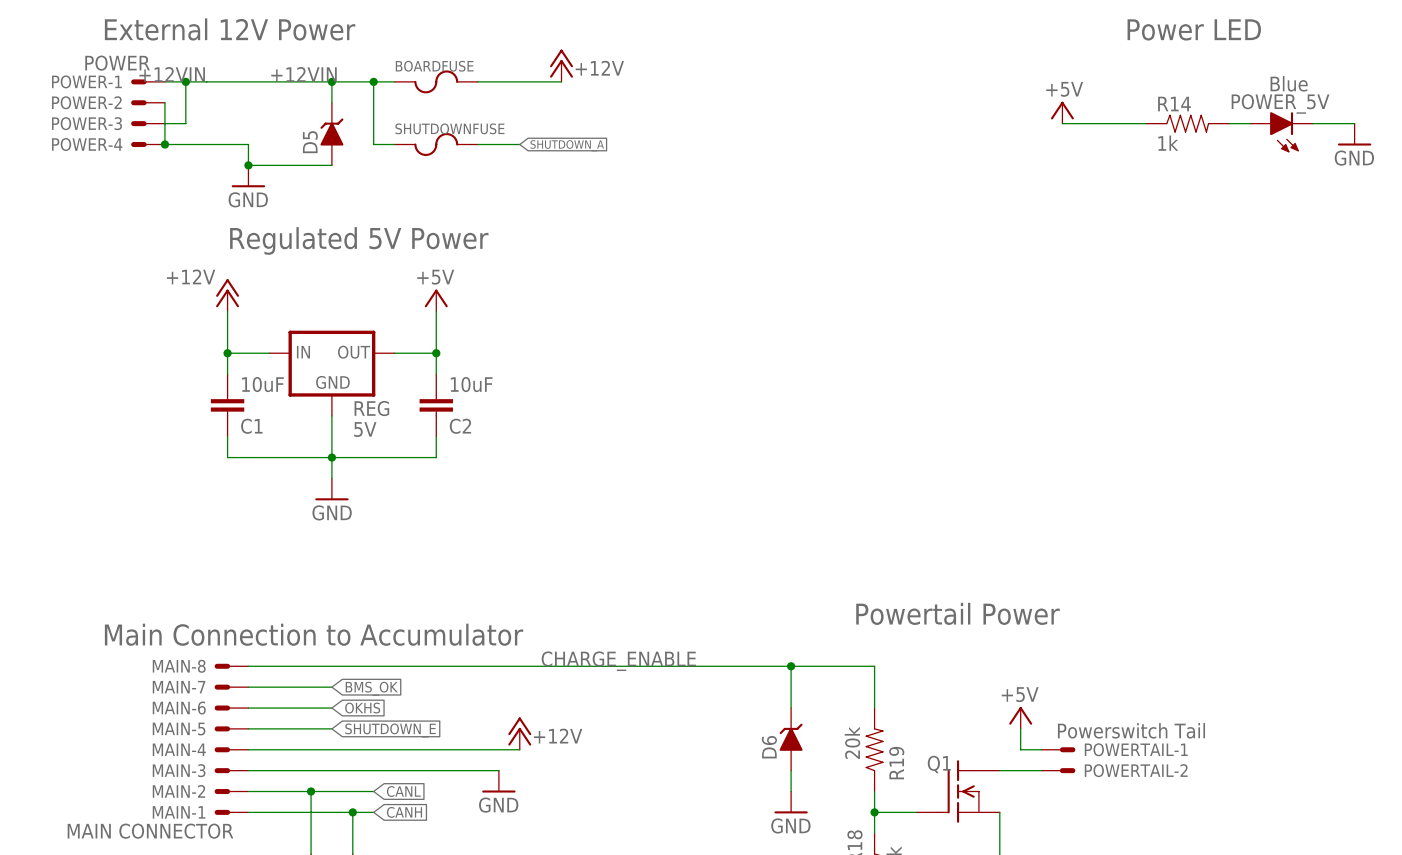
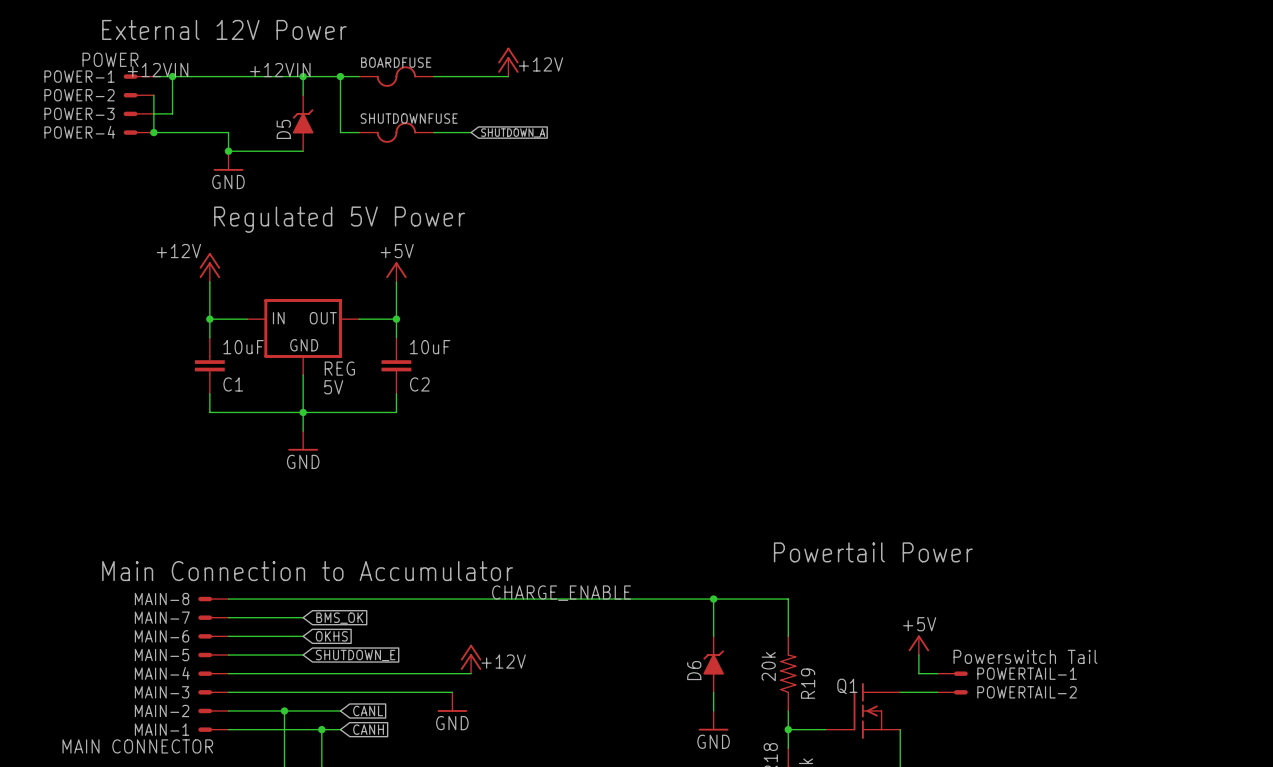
text: Power LED (1194, 29) -> none
power symbol: +5V (1062, 112) -> none
wire: (1062, 123) (1145, 123) -> none
R14: 1k (1187, 123) -> none
wire: (1229, 123) (1250, 123) -> none
wire: (1312, 123) (1354, 123) -> none
POWER_5V: Blue (1281, 132) -> none
power symbol: GND (1354, 134) -> none

